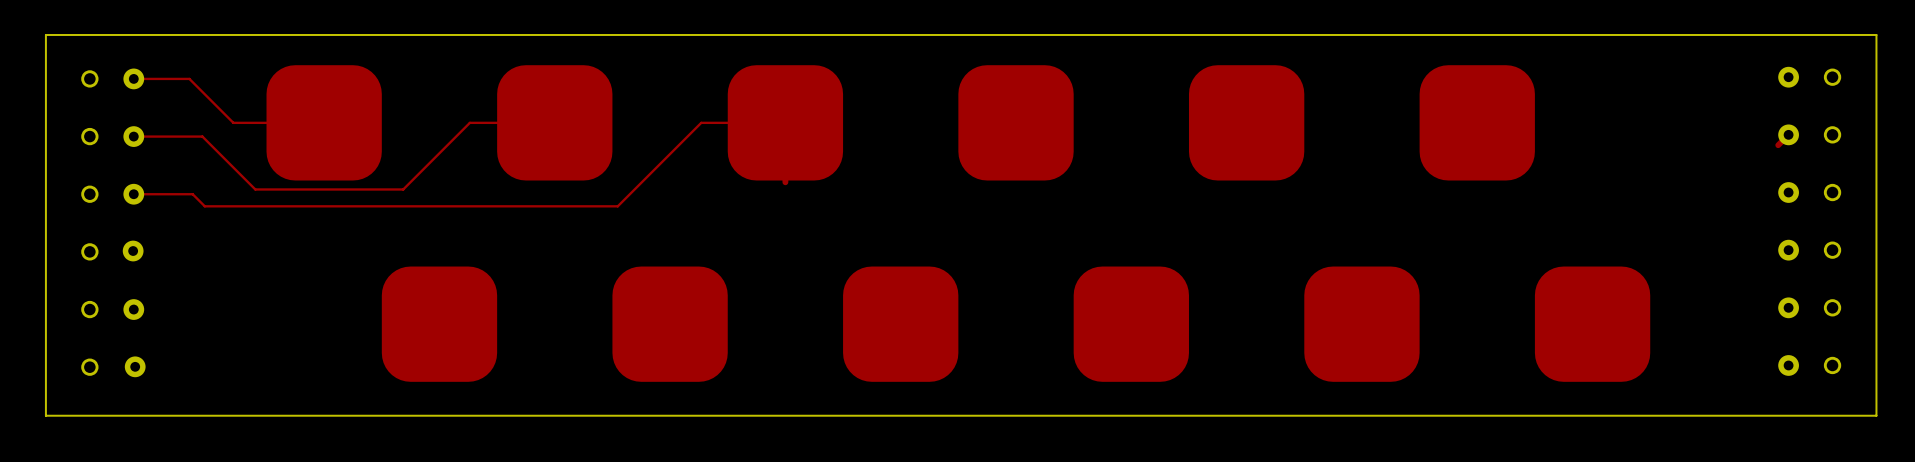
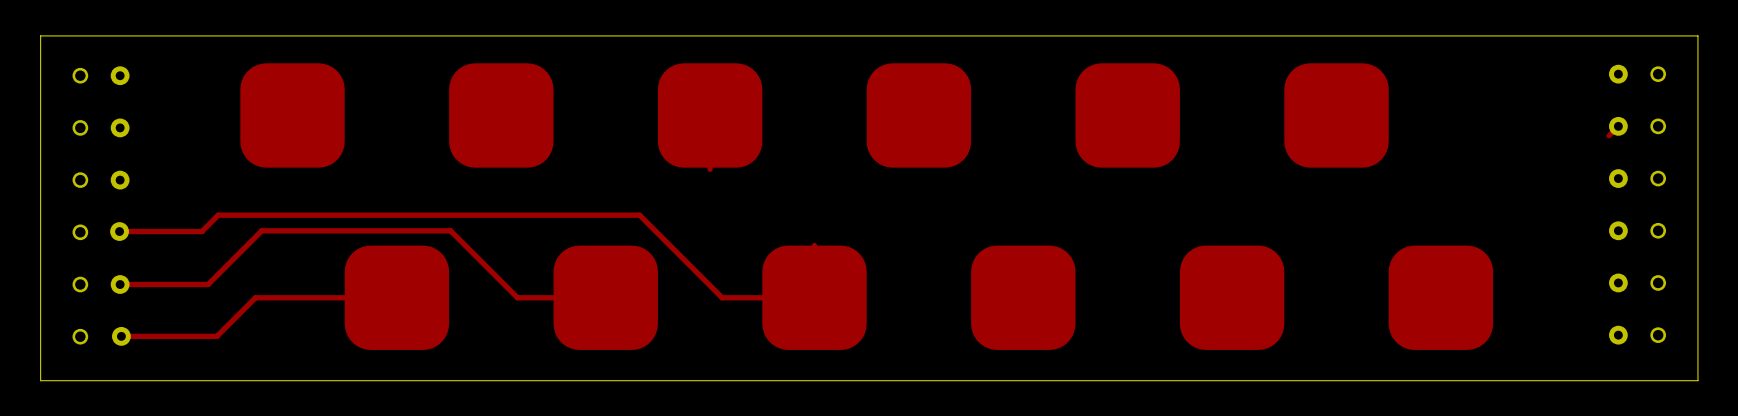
track: (133, 78) (189, 78) (233, 122) (324, 122) -> none
track: (554, 122) (469, 122) (403, 189) (255, 189) (202, 136) (133, 136) -> none
track: (785, 122) (701, 122) (617, 206) (204, 206) (192, 194) (133, 194) -> none
track: none -> (119, 231) (201, 231) (218, 215) (639, 215) (722, 297) (814, 297) (814, 245)
track: none -> (120, 284) (208, 284) (261, 230) (450, 230) (517, 297) (605, 297)
track: none -> (396, 297) (255, 297) (216, 336) (121, 336)

